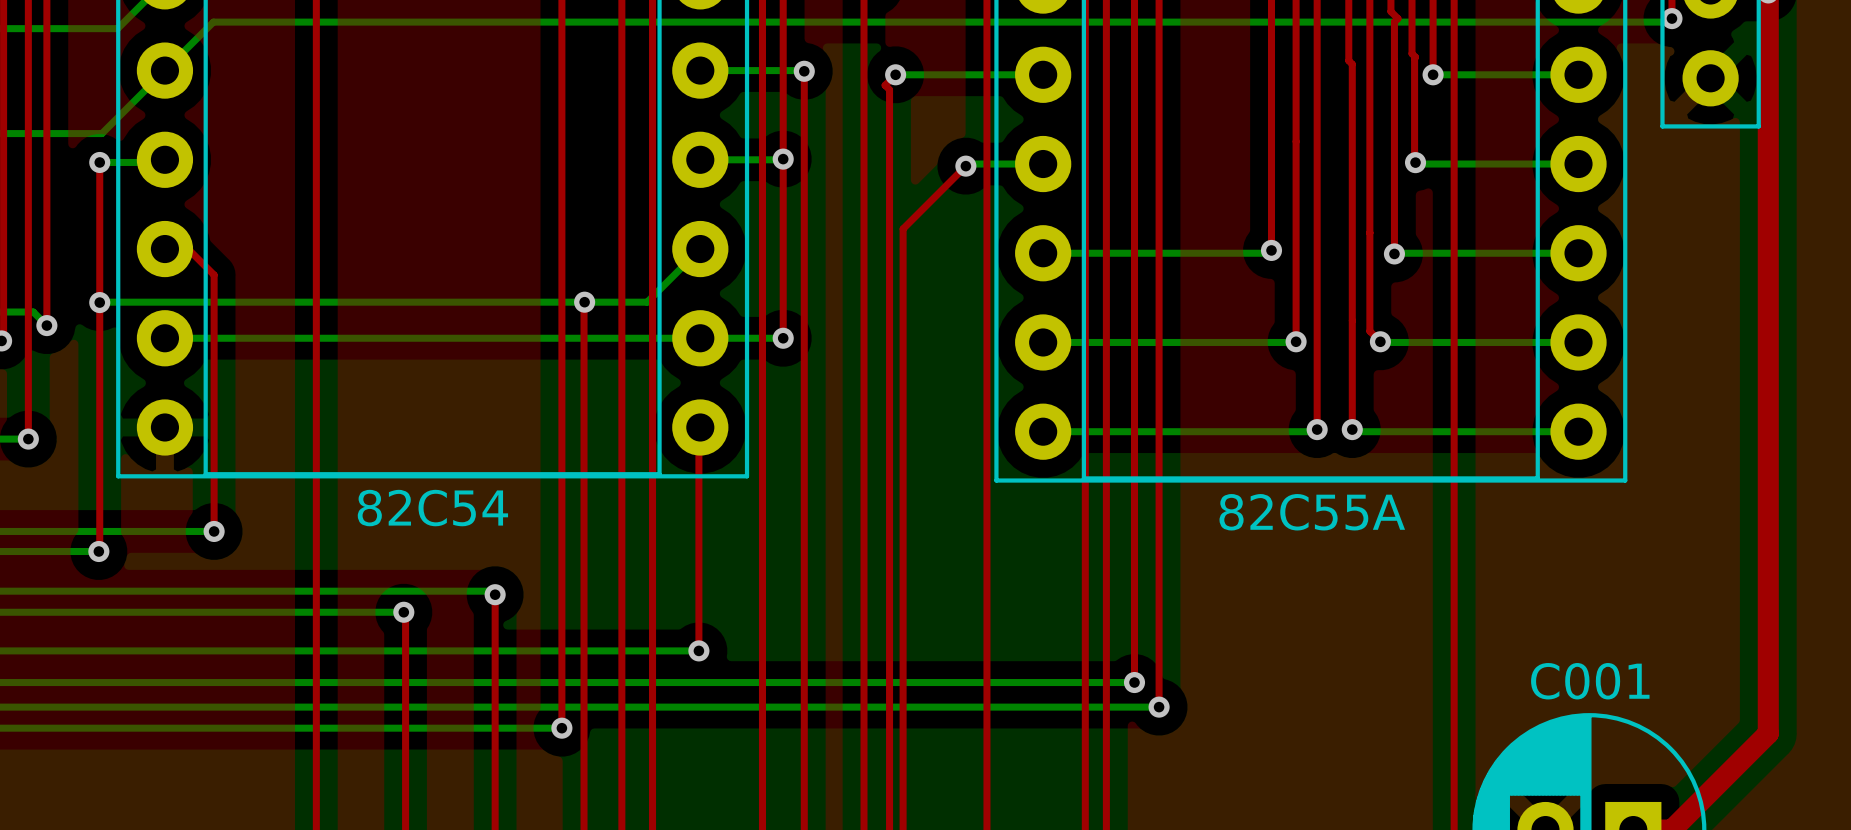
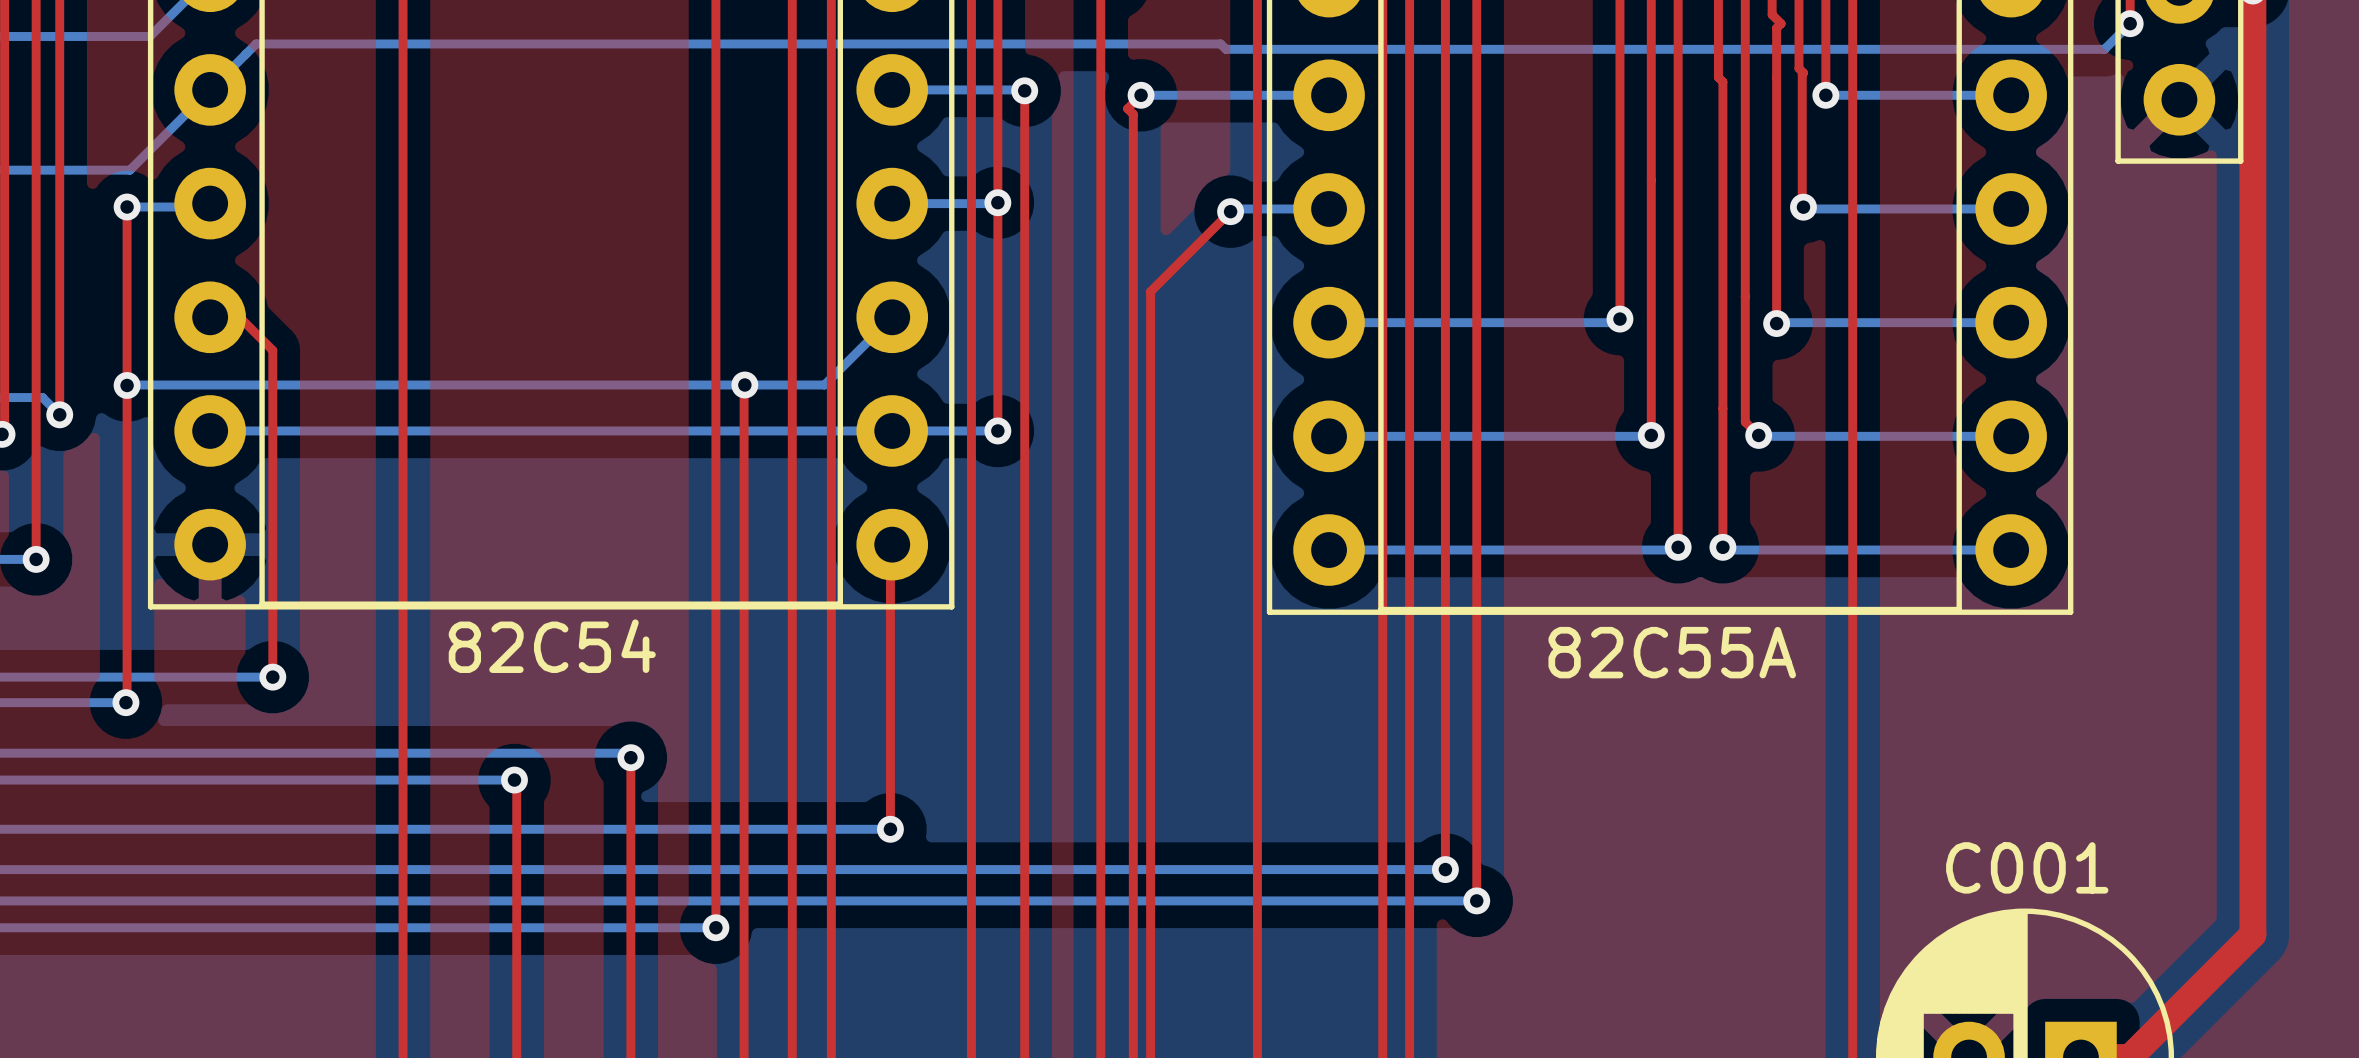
bottom track: (1668, 22) (213, 22) (201, 34) -> (2125, 28) (2104, 49) (1225, 49) (1220, 43) (256, 43)

